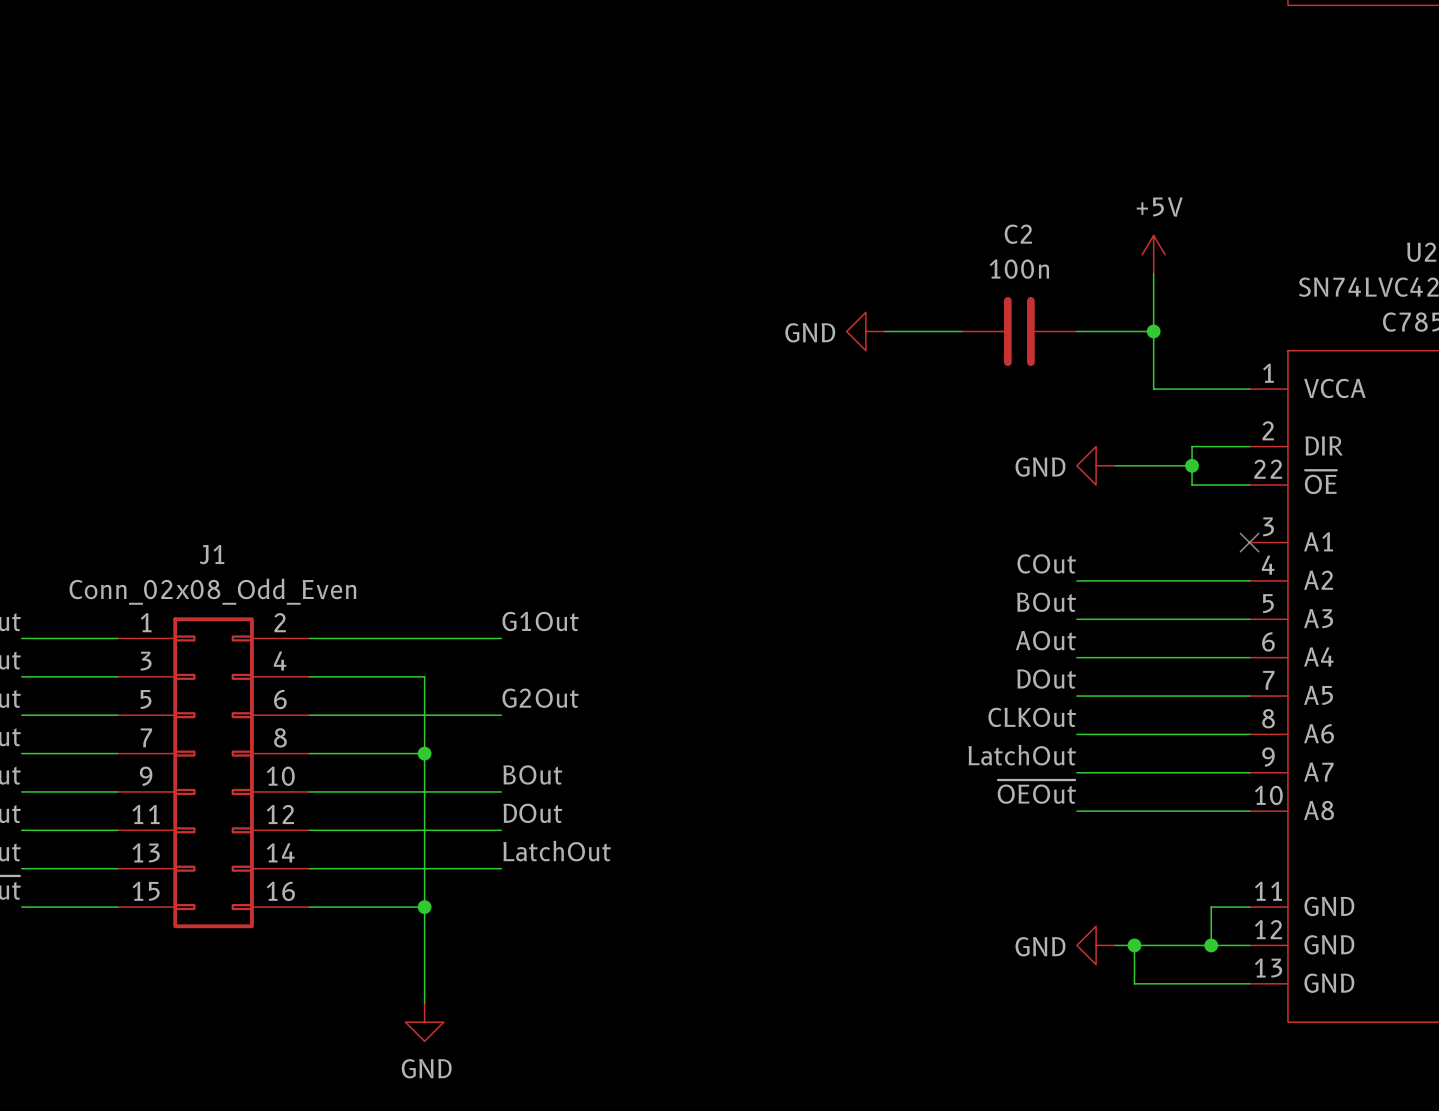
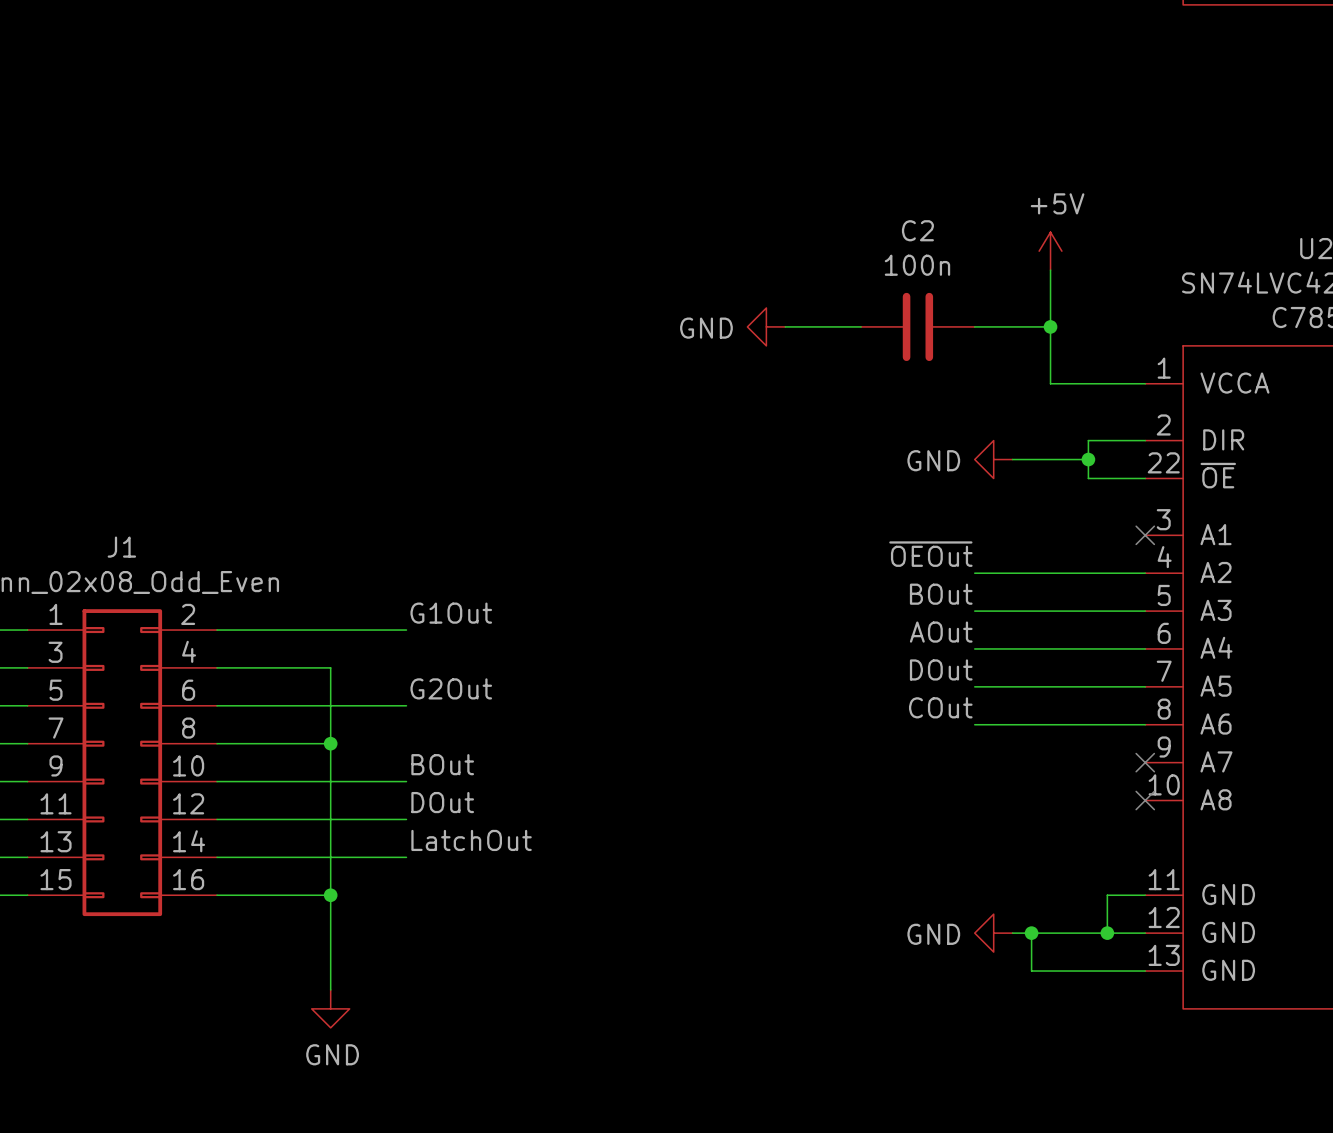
label: COut (1046, 563) -> ~{OEOut} (930, 554)
label: CLKOut (1032, 717) -> COut (940, 707)
label: LatchOut (1022, 755) -> none
wire: (1076, 772) (1249, 772) -> none
no-connect mark: none -> (1145, 762)
label: ~{OEOut} (1036, 791) -> none
wire: (1076, 811) (1249, 811) -> none
no-connect mark: none -> (1145, 800)

